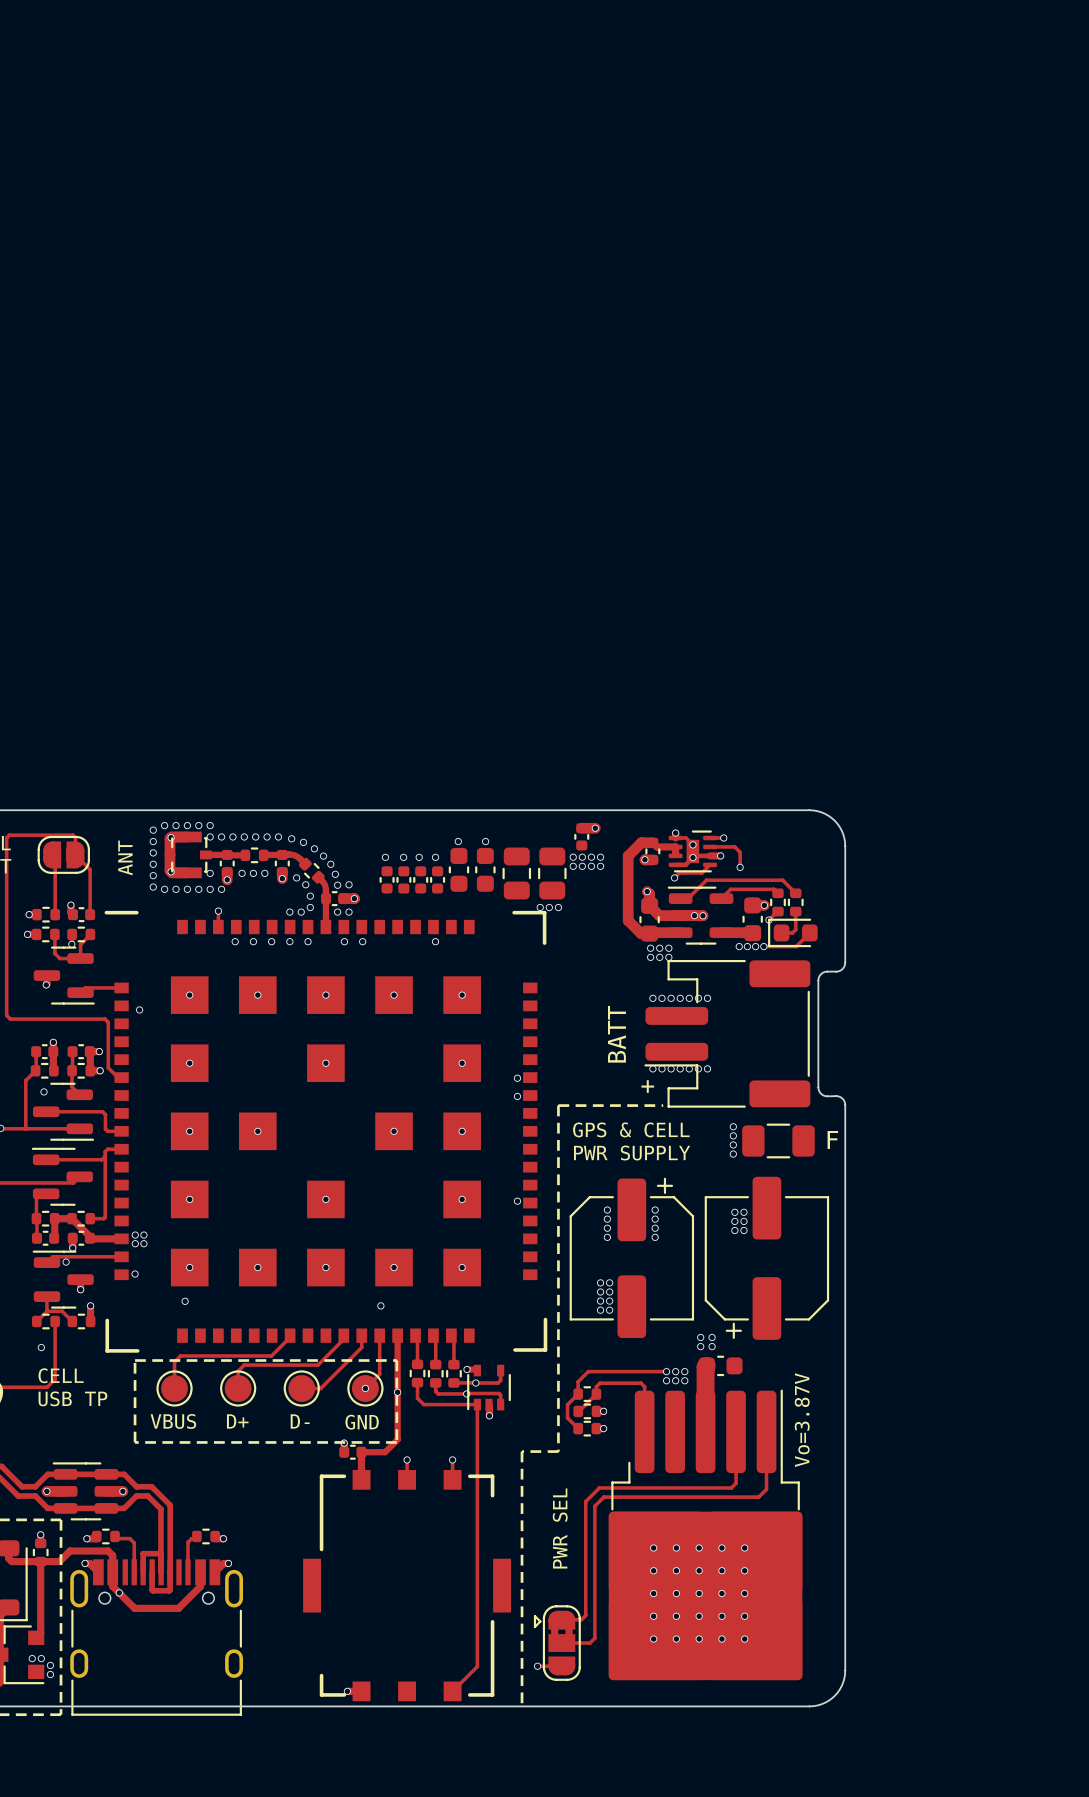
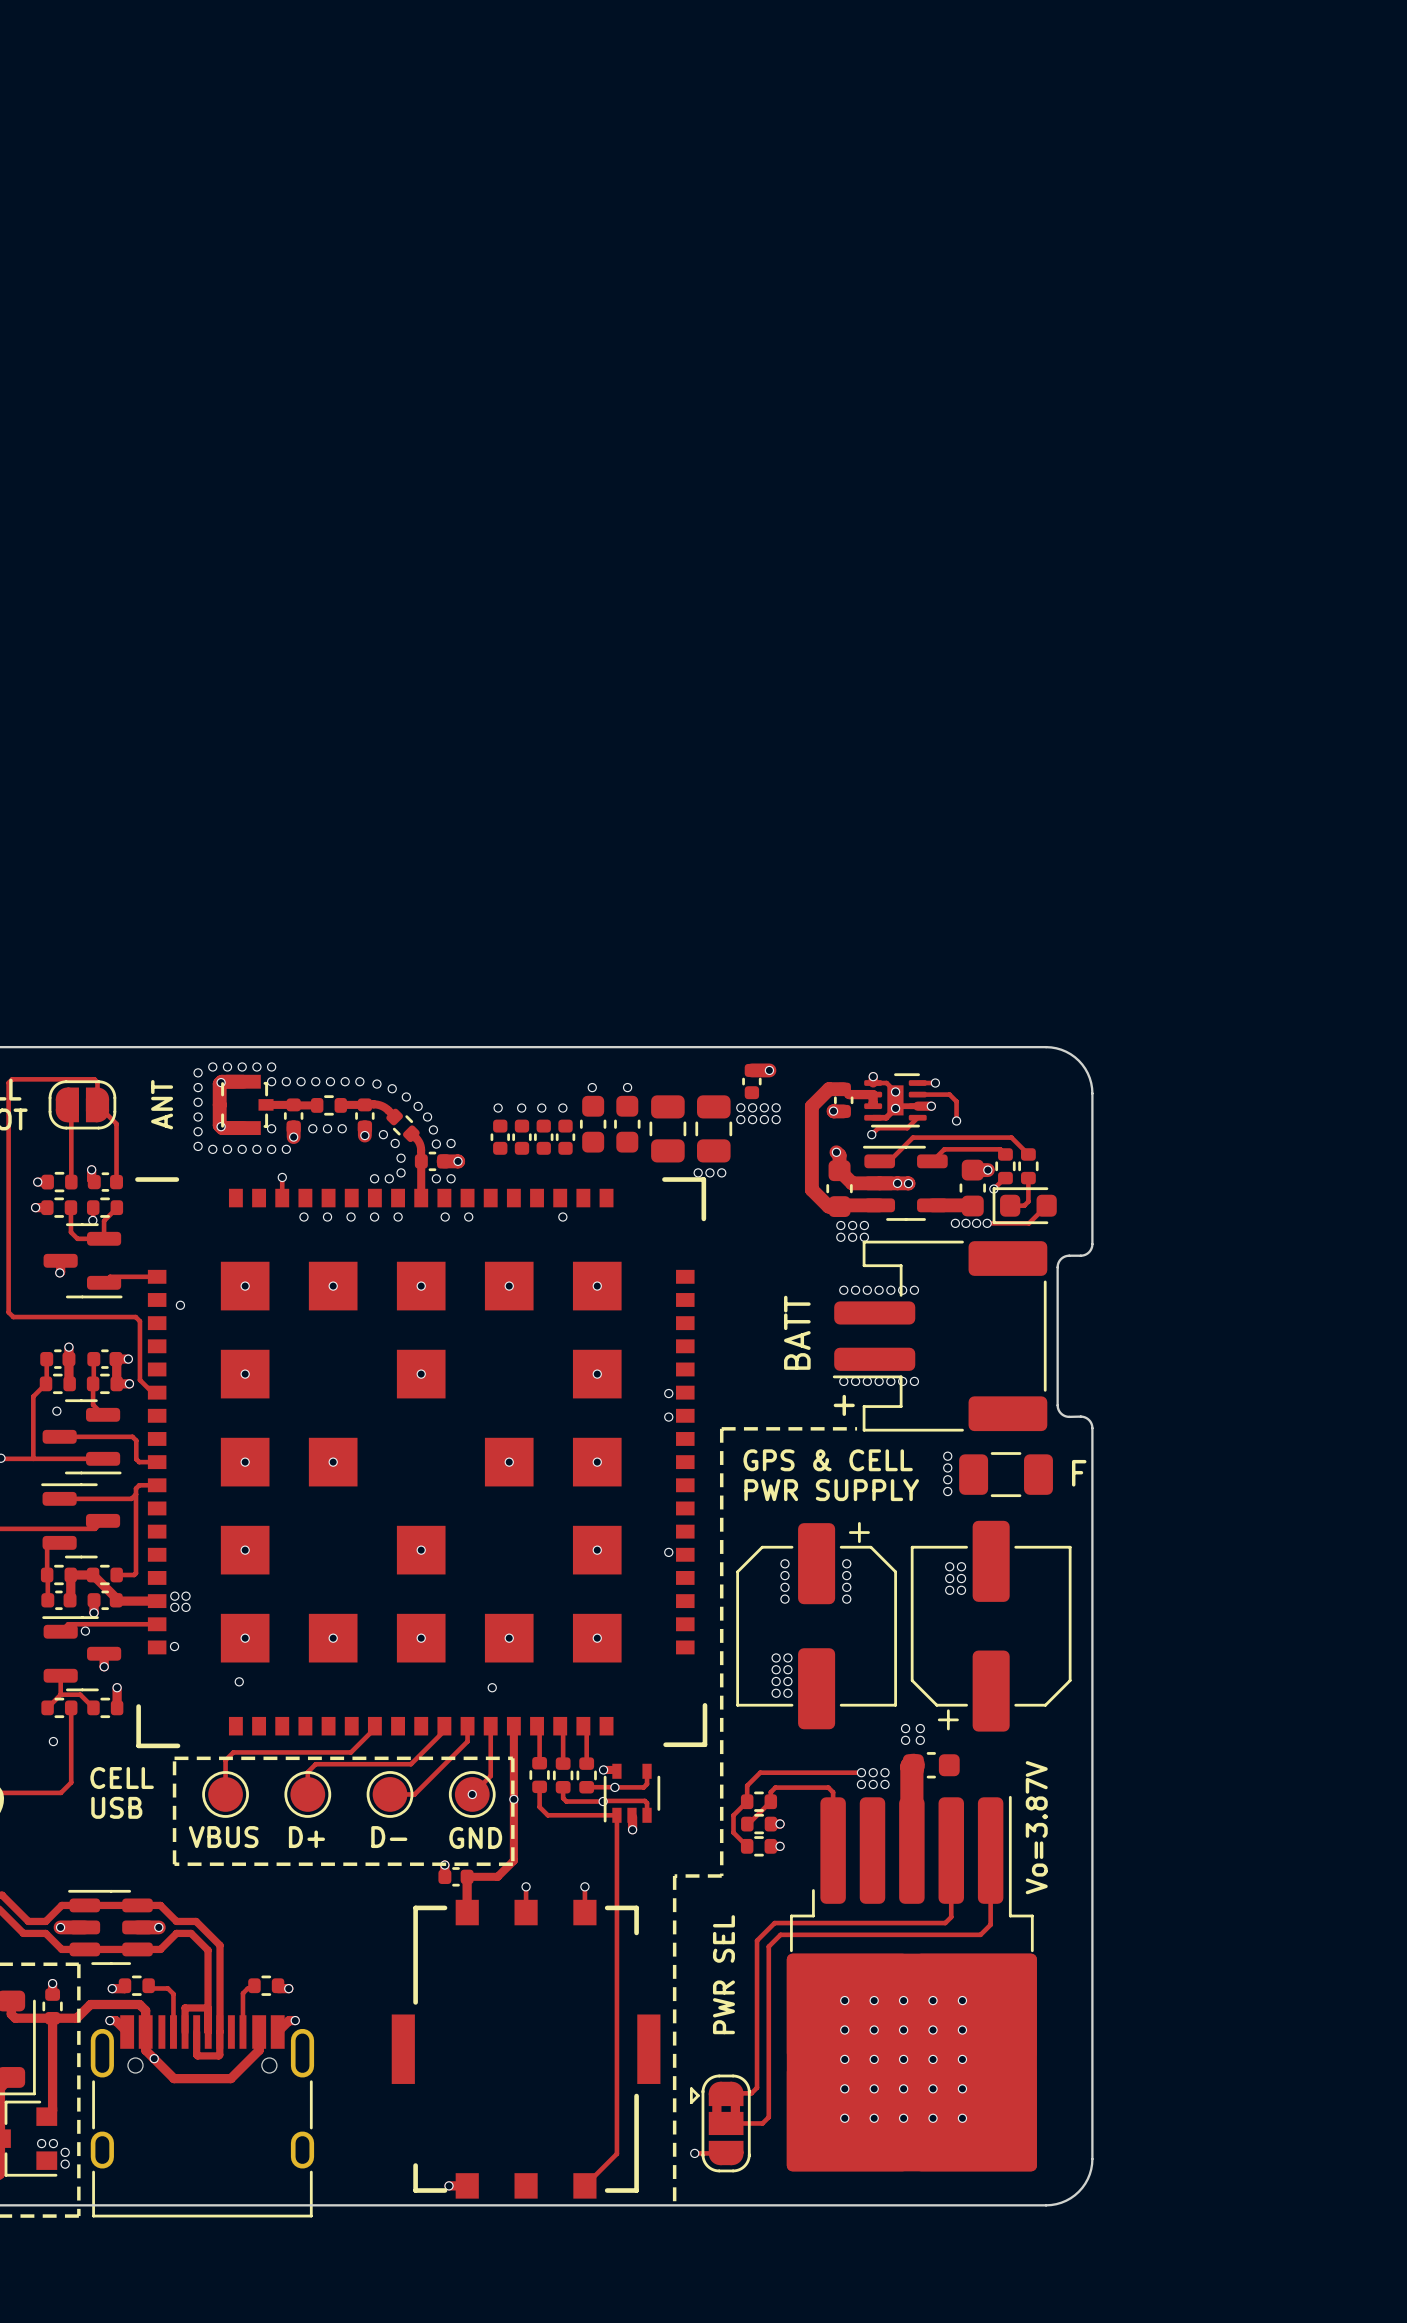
text position: CELL (61, 1375) -> CELL (122, 1778)
text: USB TP (72, 1398) -> USB (116, 1807)

